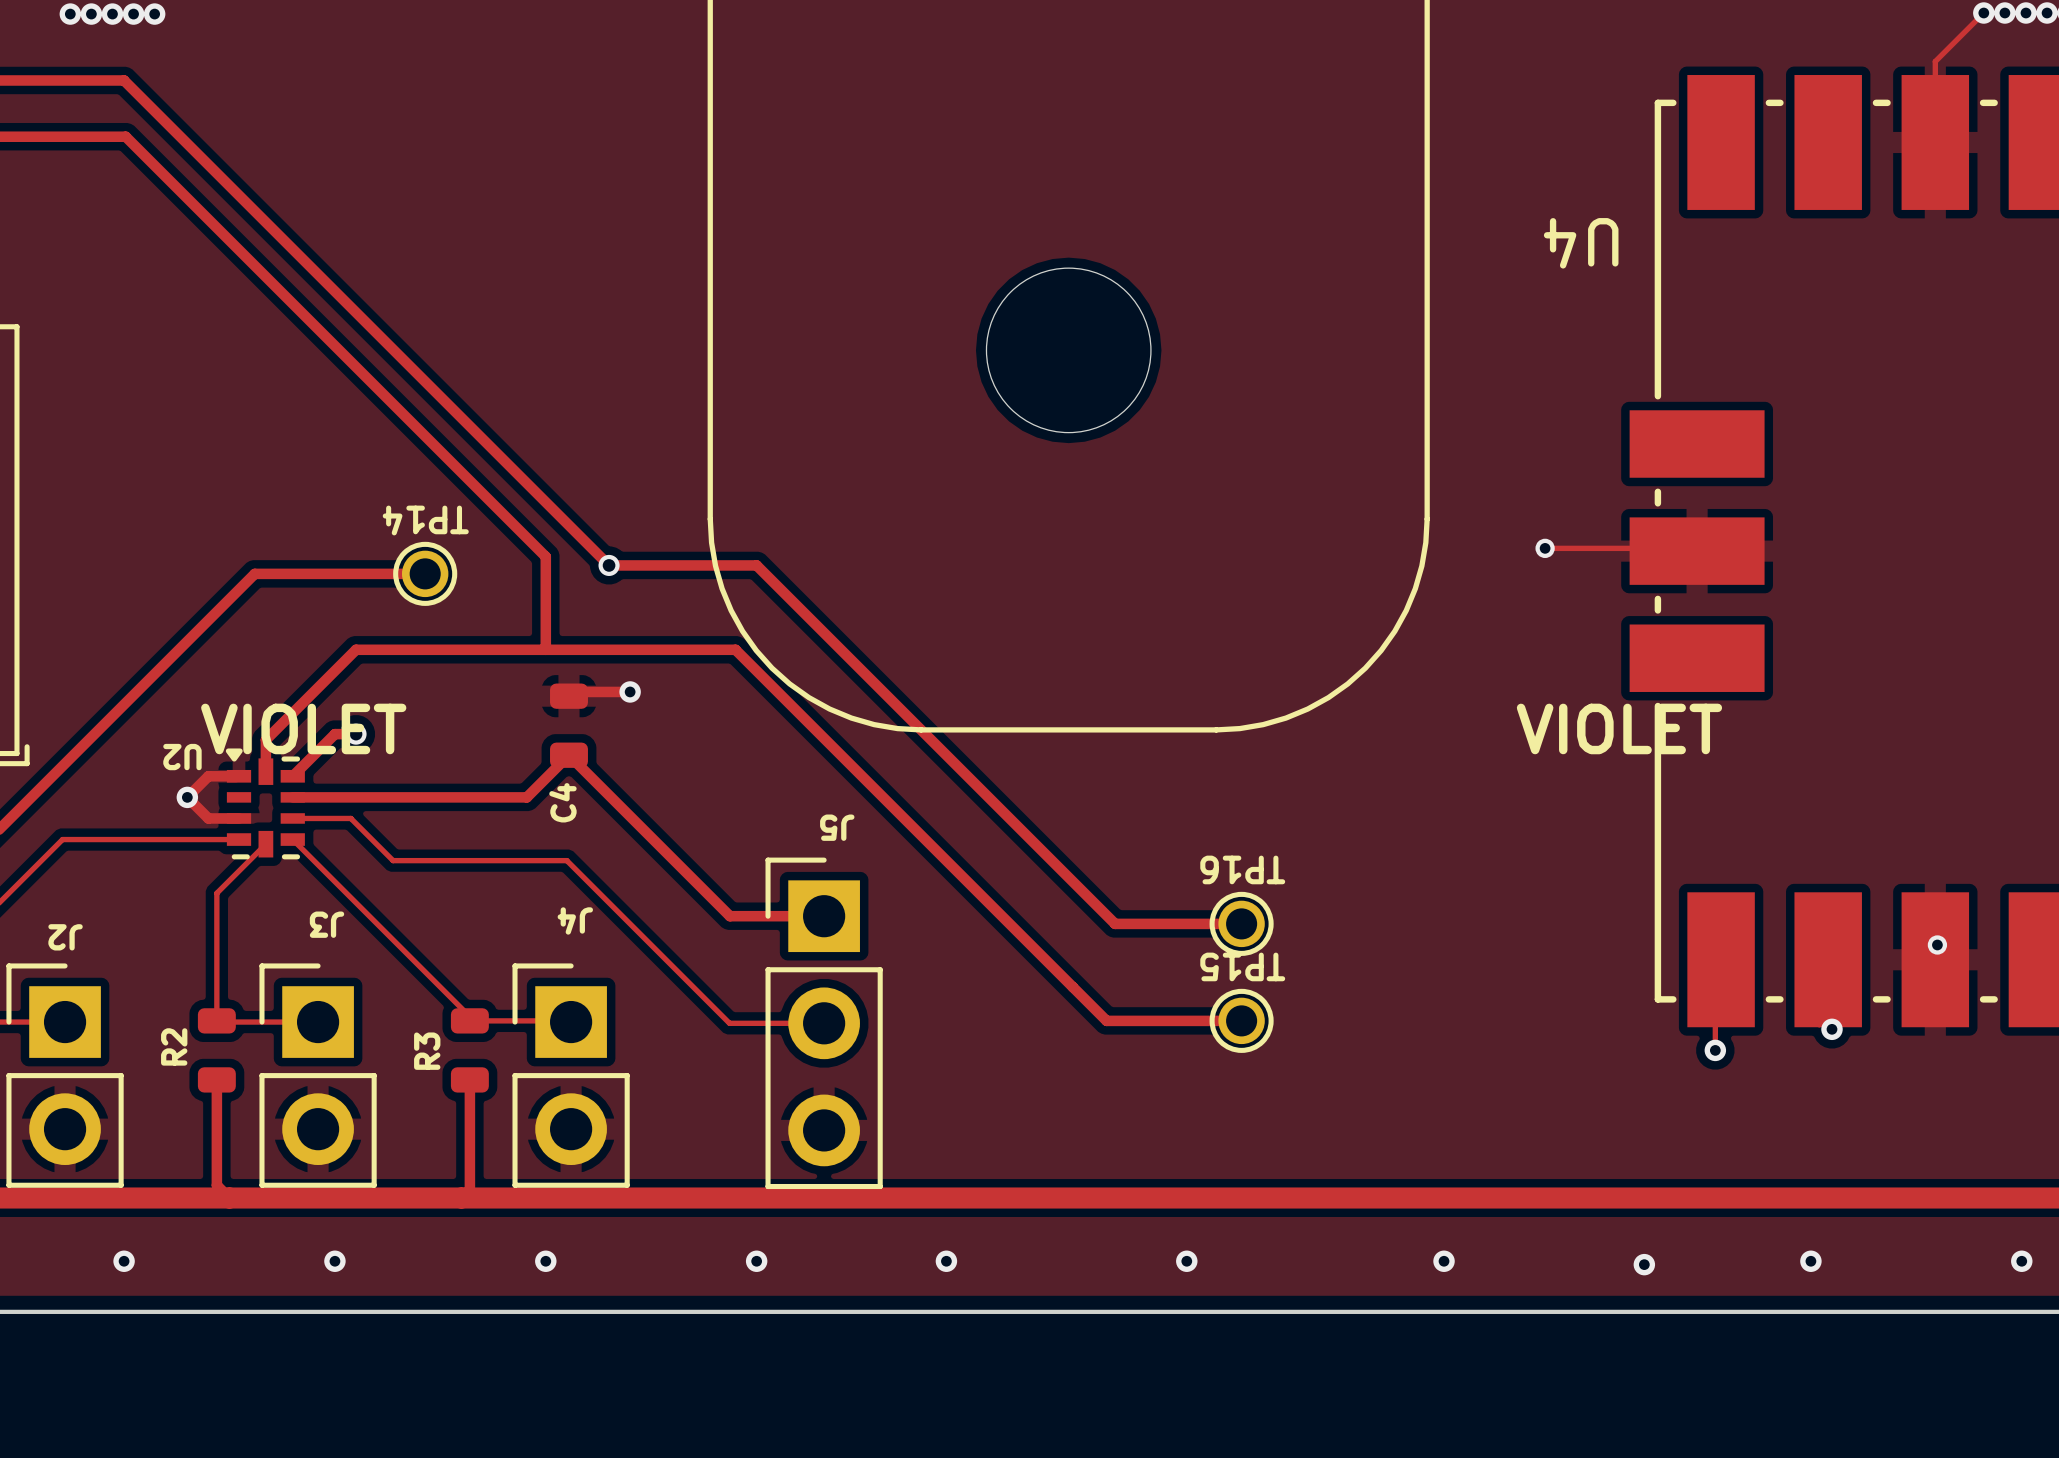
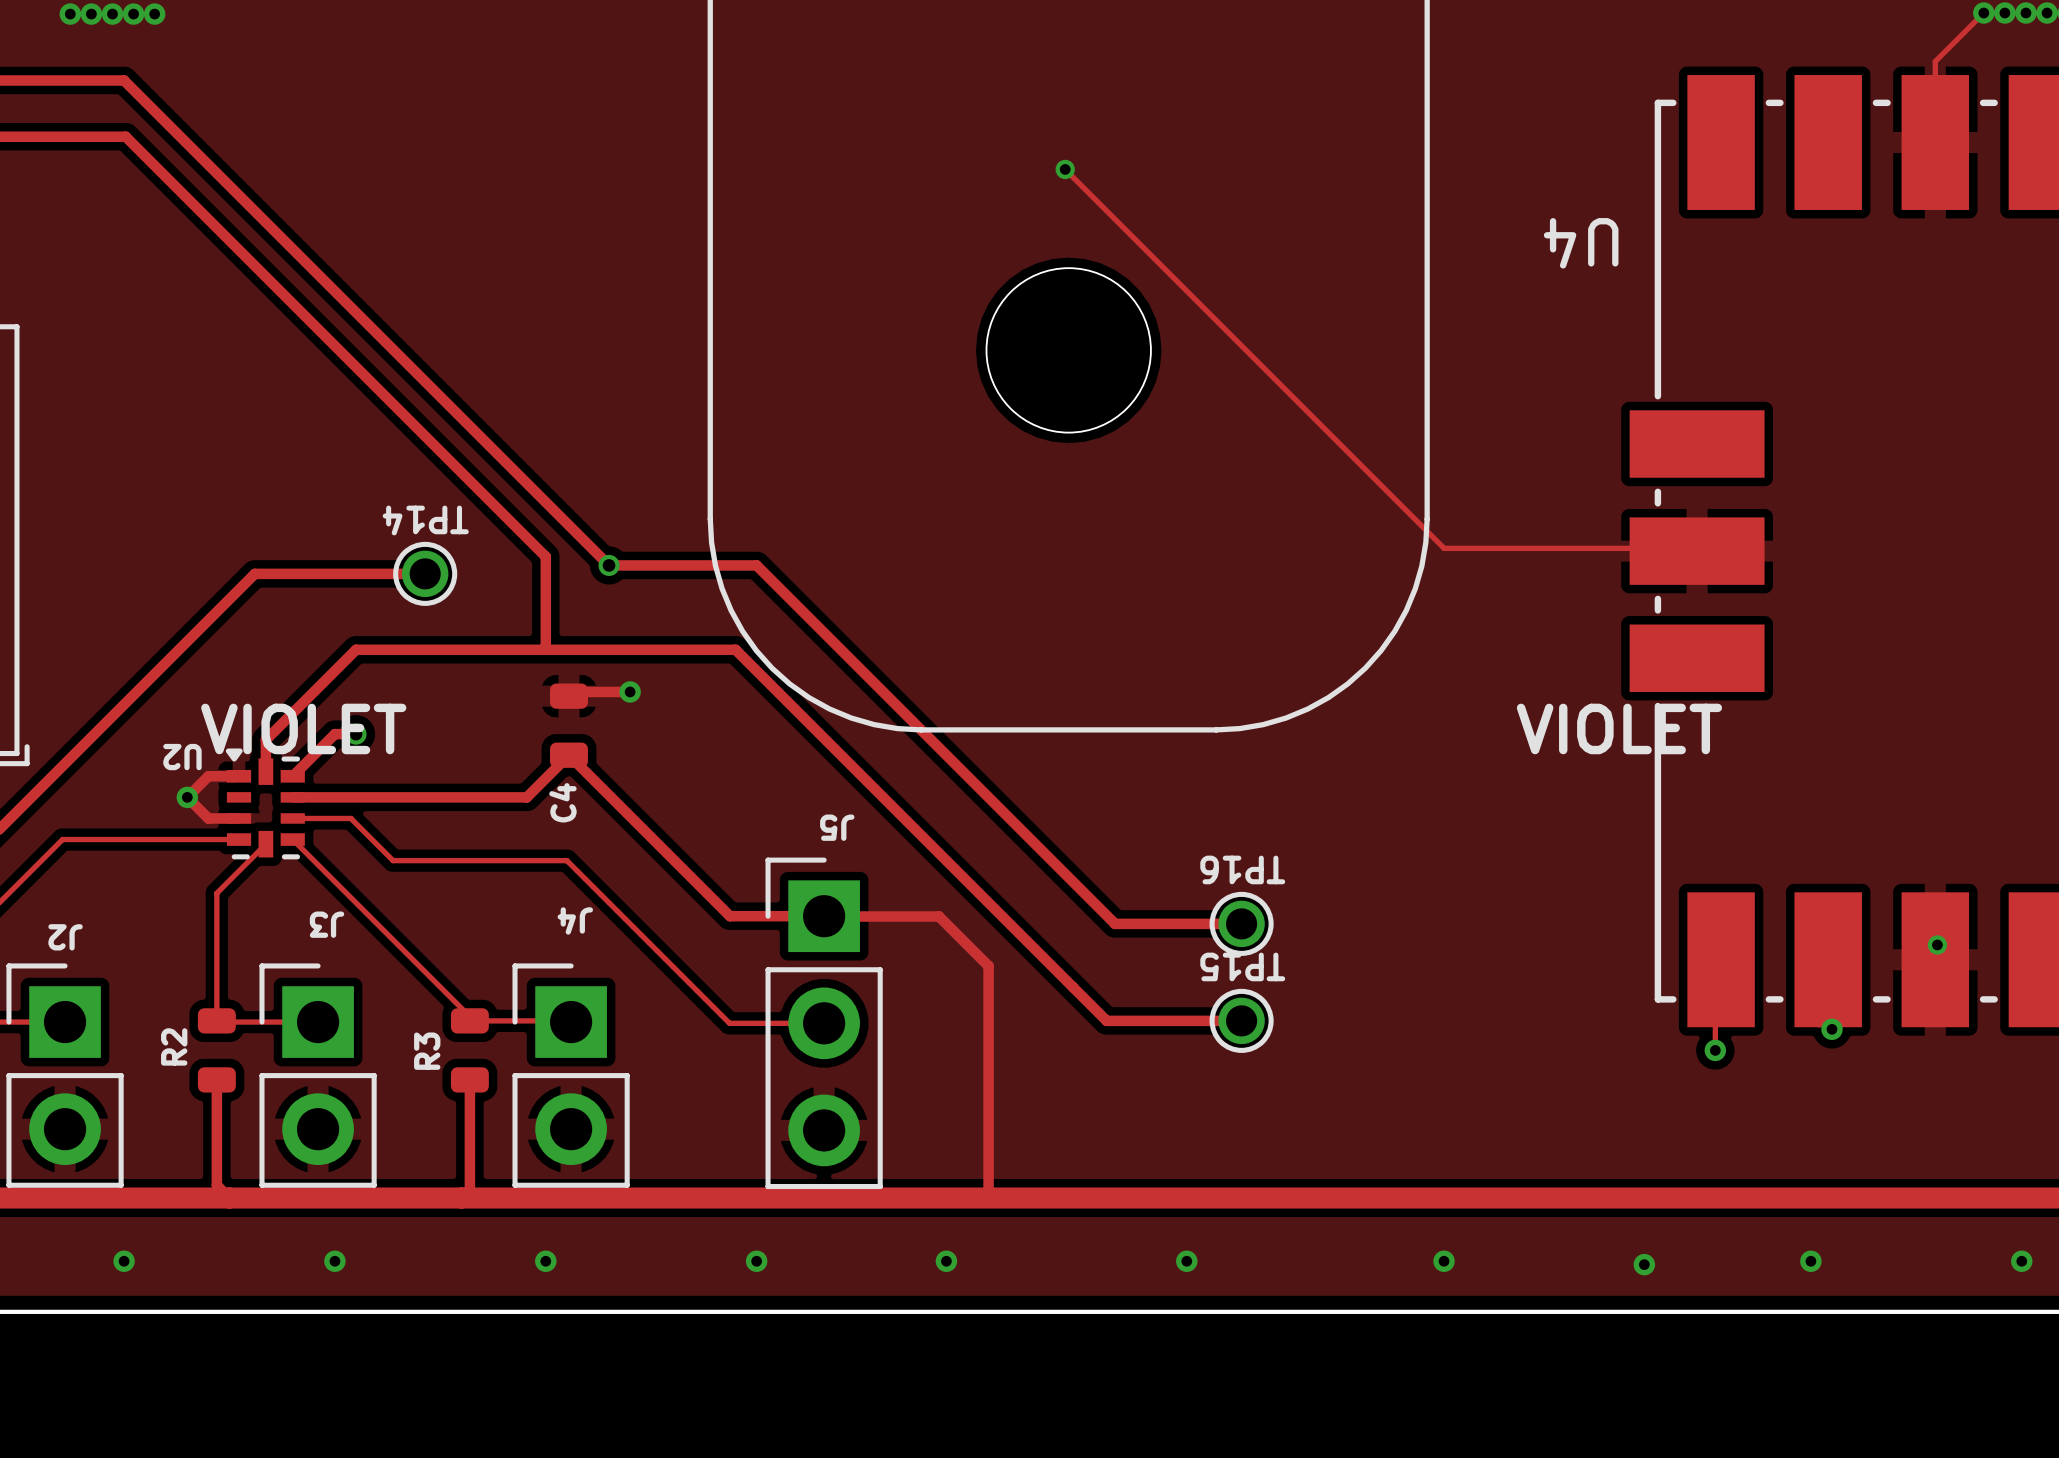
track: none -> (1065, 169) (1444, 548) (1545, 548)
via: none -> (1065, 169)
via: (1545, 548) -> none
track: none -> (825, 916) (939, 916) (988, 966) (988, 1198)

